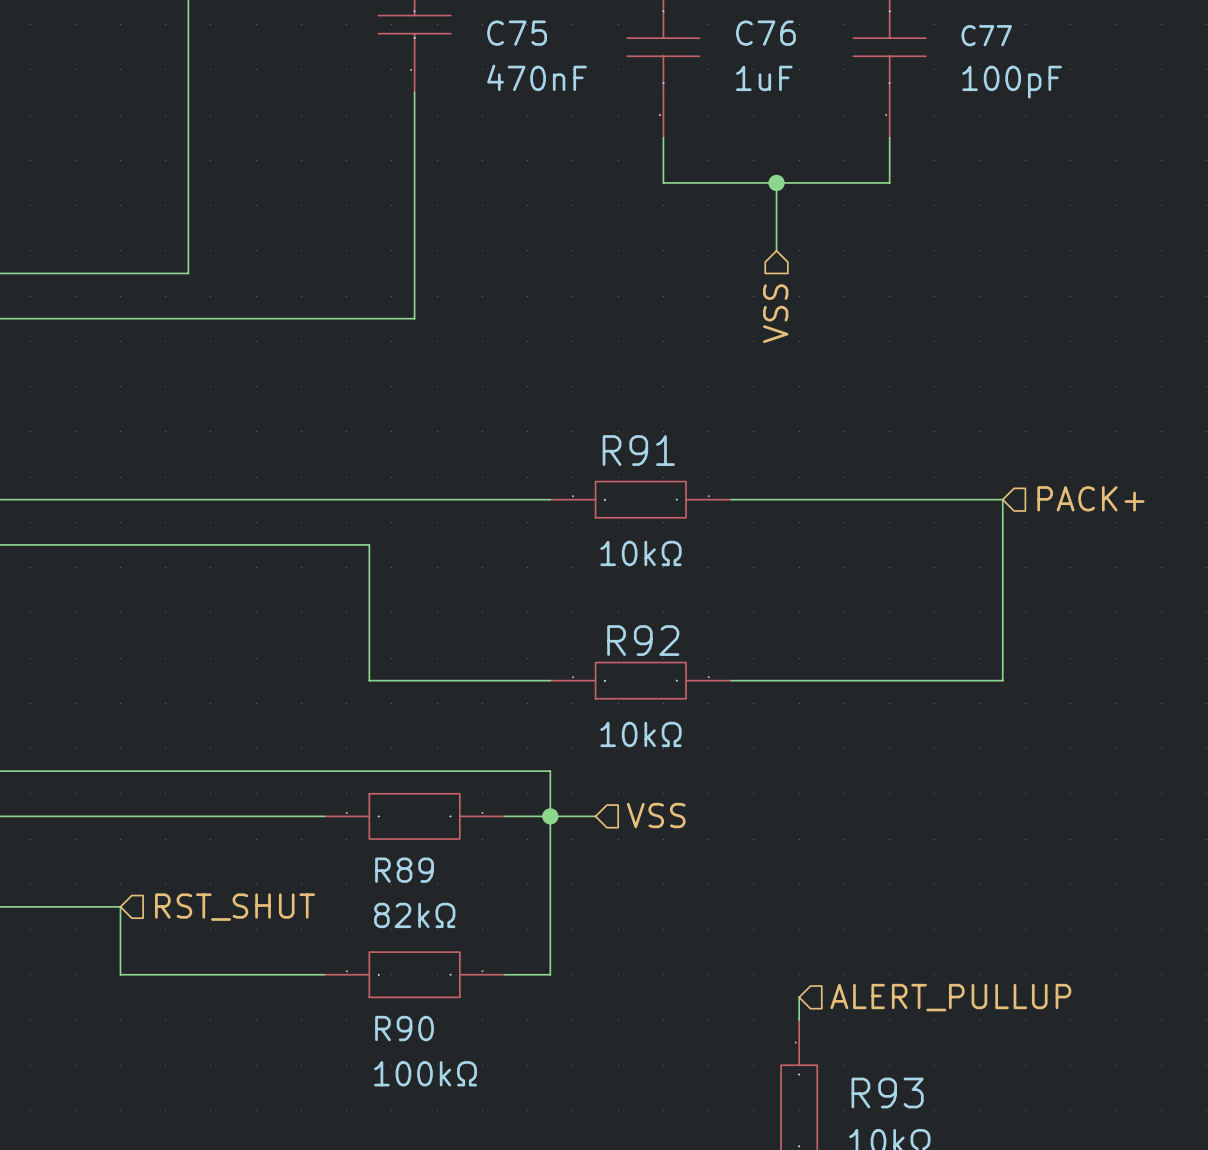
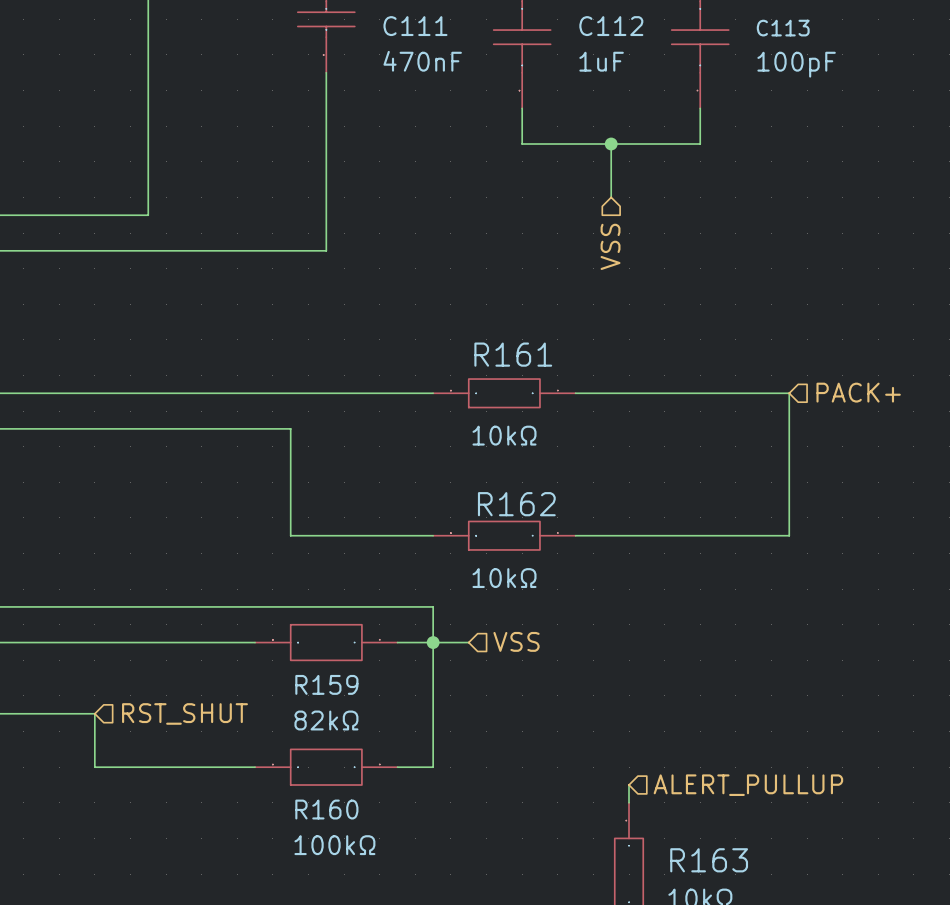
C75 name: C75 (517, 33) -> C111 (415, 26)
C76 name: C76 (765, 33) -> C112 (611, 26)
C77 name: C77 (986, 35) -> C113 (783, 28)
R91 name: R91 (638, 450) -> R161 (513, 354)
R92 name: R92 (643, 640) -> R162 (516, 504)
R89 name: R89 (404, 870) -> R159 (326, 684)
R90 name: R90 (404, 1028) -> R160 (326, 809)
R93 name: R93 (887, 1093) -> R163 (709, 860)

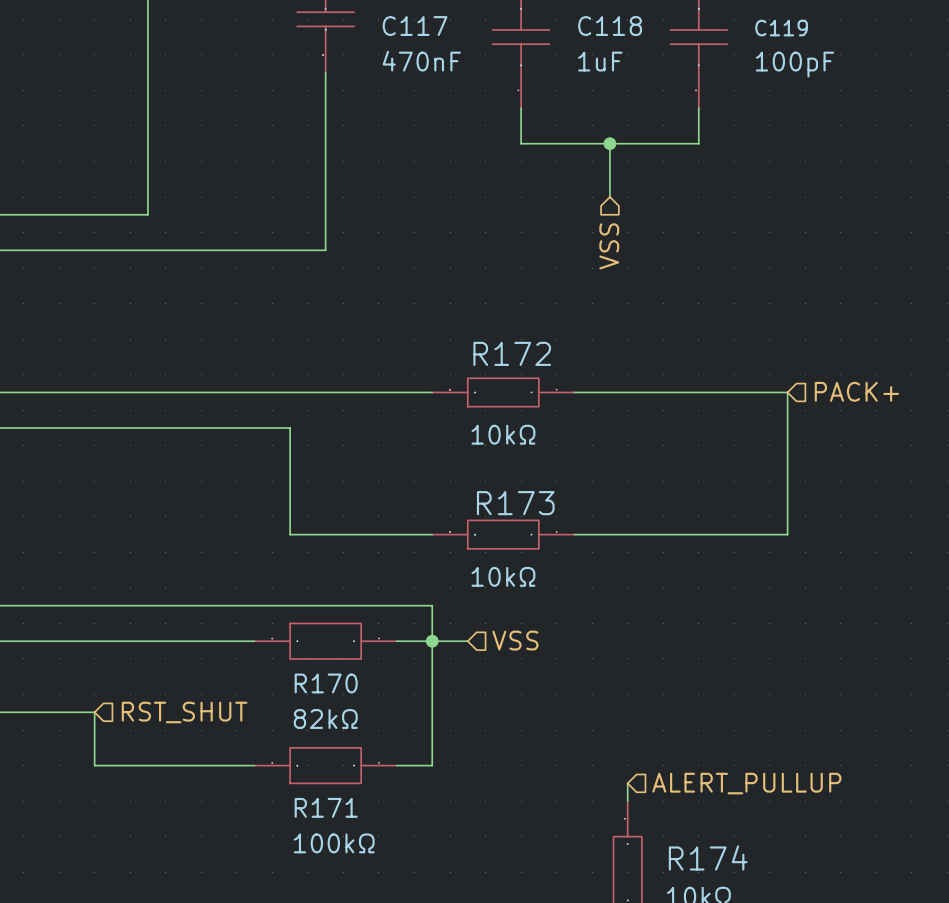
C111 name: C111 (415, 26) -> C117 (415, 26)
C112 name: C112 (611, 26) -> C118 (610, 26)
C113 name: C113 (783, 28) -> C119 (781, 28)
R161 name: R161 (513, 354) -> R172 (512, 353)
R162 name: R162 (516, 504) -> R173 (515, 503)
R159 name: R159 (326, 684) -> R170 (326, 683)
R160 name: R160 (326, 809) -> R171 (326, 807)
R163 name: R163 (709, 860) -> R174 (708, 857)

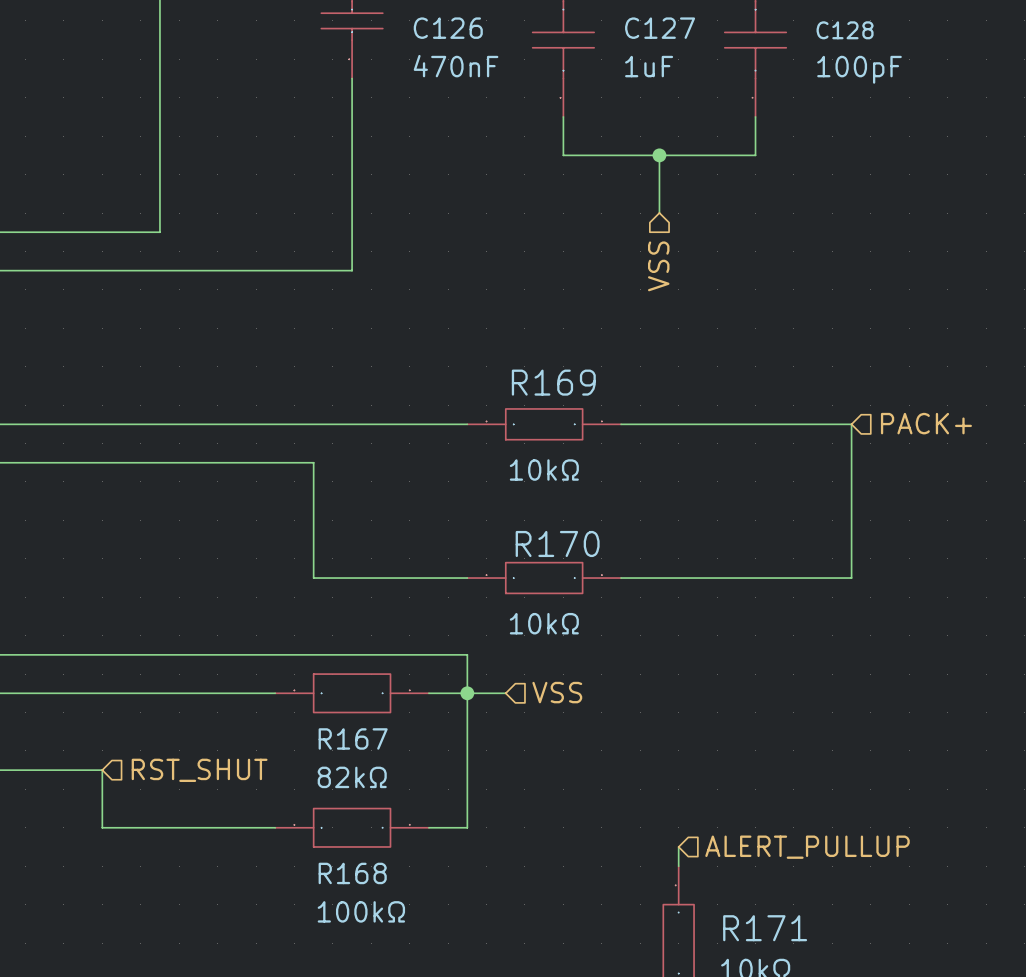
C117 name: C117 (415, 26) -> C126 (448, 28)
C118 name: C118 (610, 26) -> C127 (660, 28)
C119 name: C119 (781, 28) -> C128 (845, 30)
R172 name: R172 (512, 353) -> R169 (553, 382)
R173 name: R173 (515, 503) -> R170 (557, 543)
R170 name: R170 (326, 683) -> R167 (353, 738)
R171 name: R171 (326, 807) -> R168 (352, 873)
R174 name: R174 (708, 857) -> R171 (765, 928)

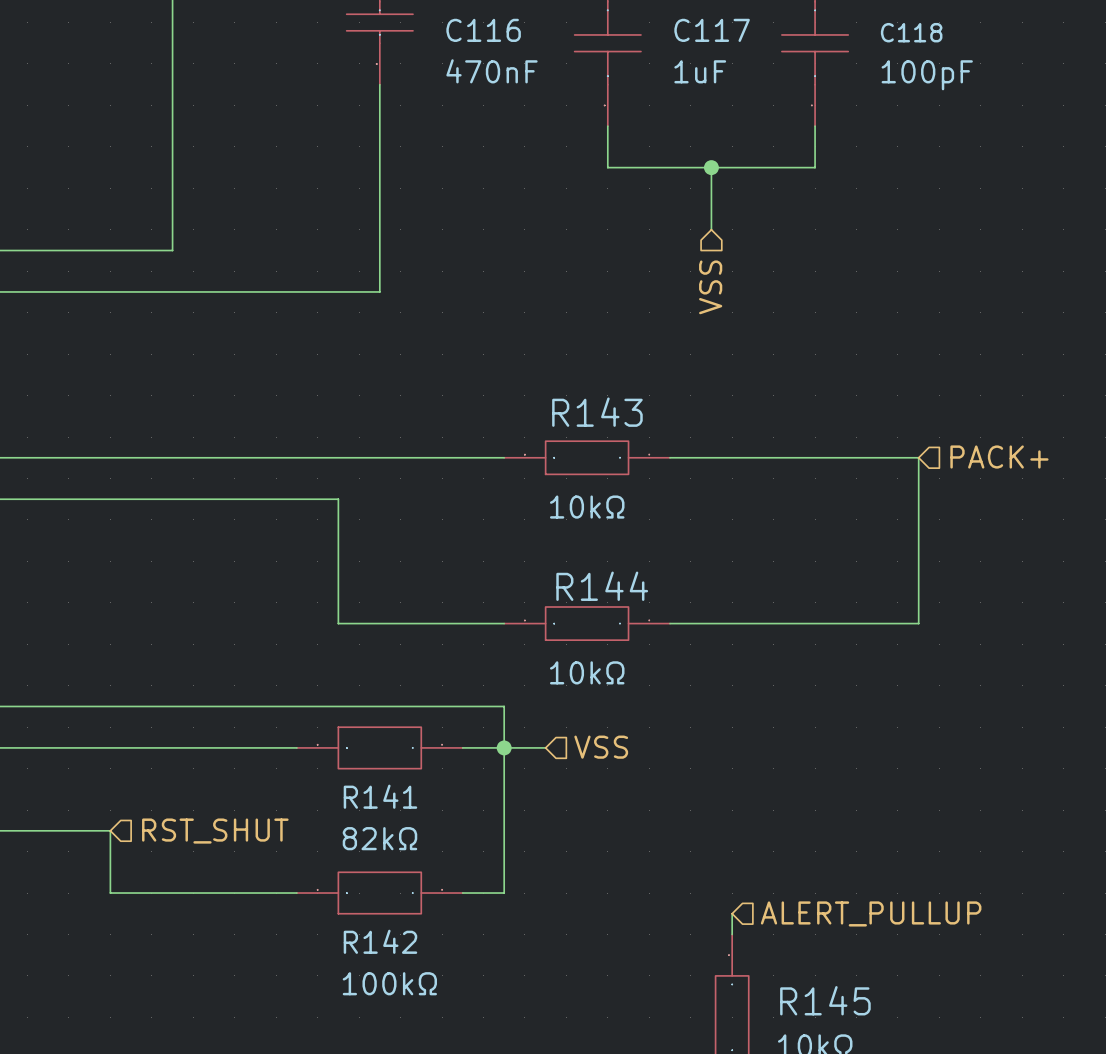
C126 name: C126 (448, 28) -> C116 (483, 30)
C127 name: C127 (660, 28) -> C117 (712, 30)
C128 name: C128 (845, 30) -> C118 (911, 32)
R169 name: R169 (553, 382) -> R143 (597, 412)
R170 name: R170 (557, 543) -> R144 (602, 586)
R167 name: R167 (353, 738) -> R141 (380, 796)
R168 name: R168 (352, 873) -> R142 (380, 941)
R171 name: R171 (765, 928) -> R145 (825, 1000)

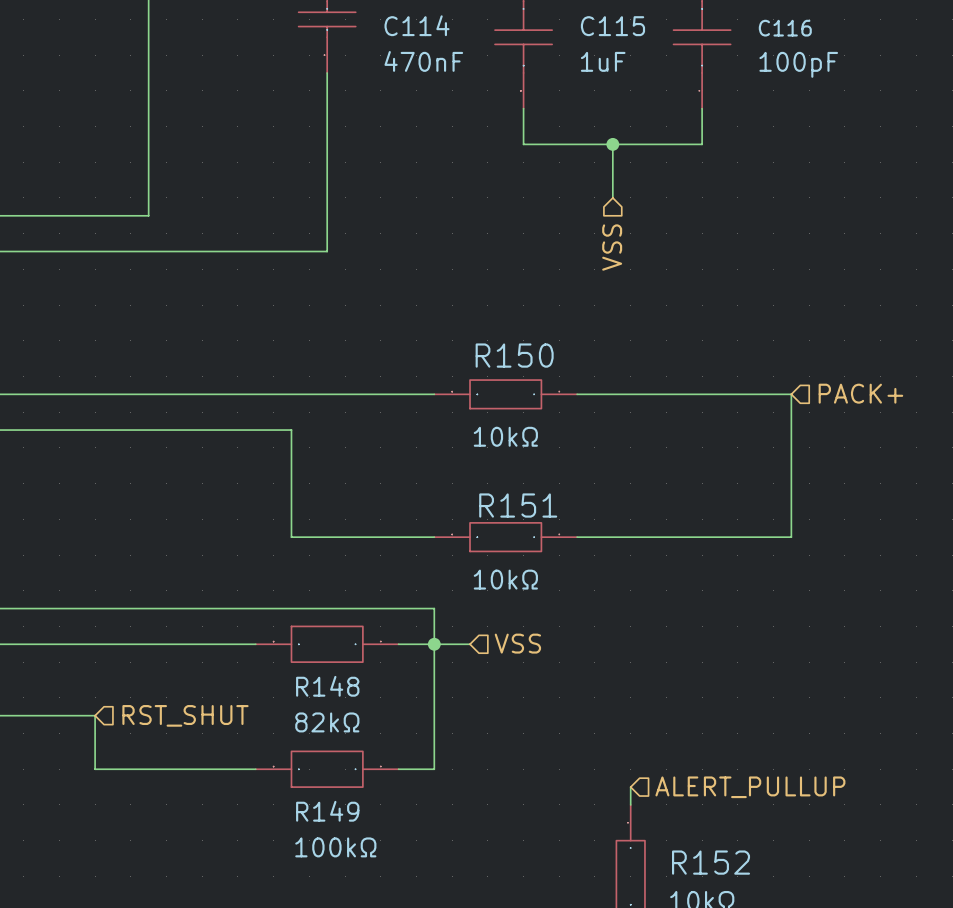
C116 name: C116 (483, 30) -> C114 (417, 25)
C117 name: C117 (712, 30) -> C115 (612, 26)
C118 name: C118 (911, 32) -> C116 (785, 28)
R143 name: R143 (597, 412) -> R150 (514, 355)
R144 name: R144 (602, 586) -> R151 (518, 505)
R141 name: R141 (380, 796) -> R148 (327, 686)
R142 name: R142 (380, 941) -> R149 (327, 811)
R145 name: R145 (825, 1000) -> R152 (711, 862)

